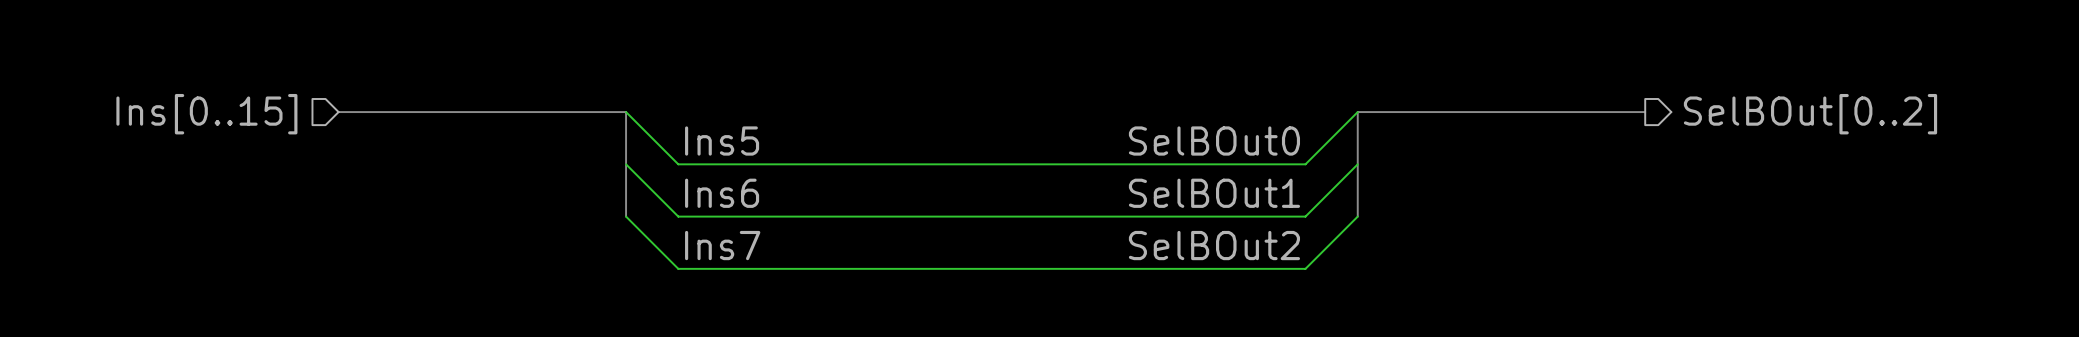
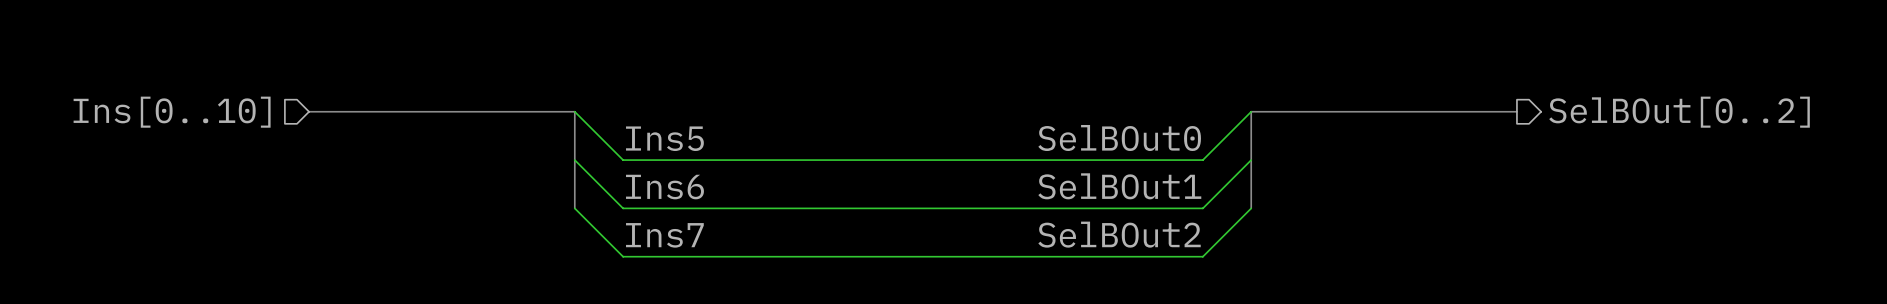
hierarchical label: Ins[0..15] (206, 114) -> Ins[0..10] (172, 112)

